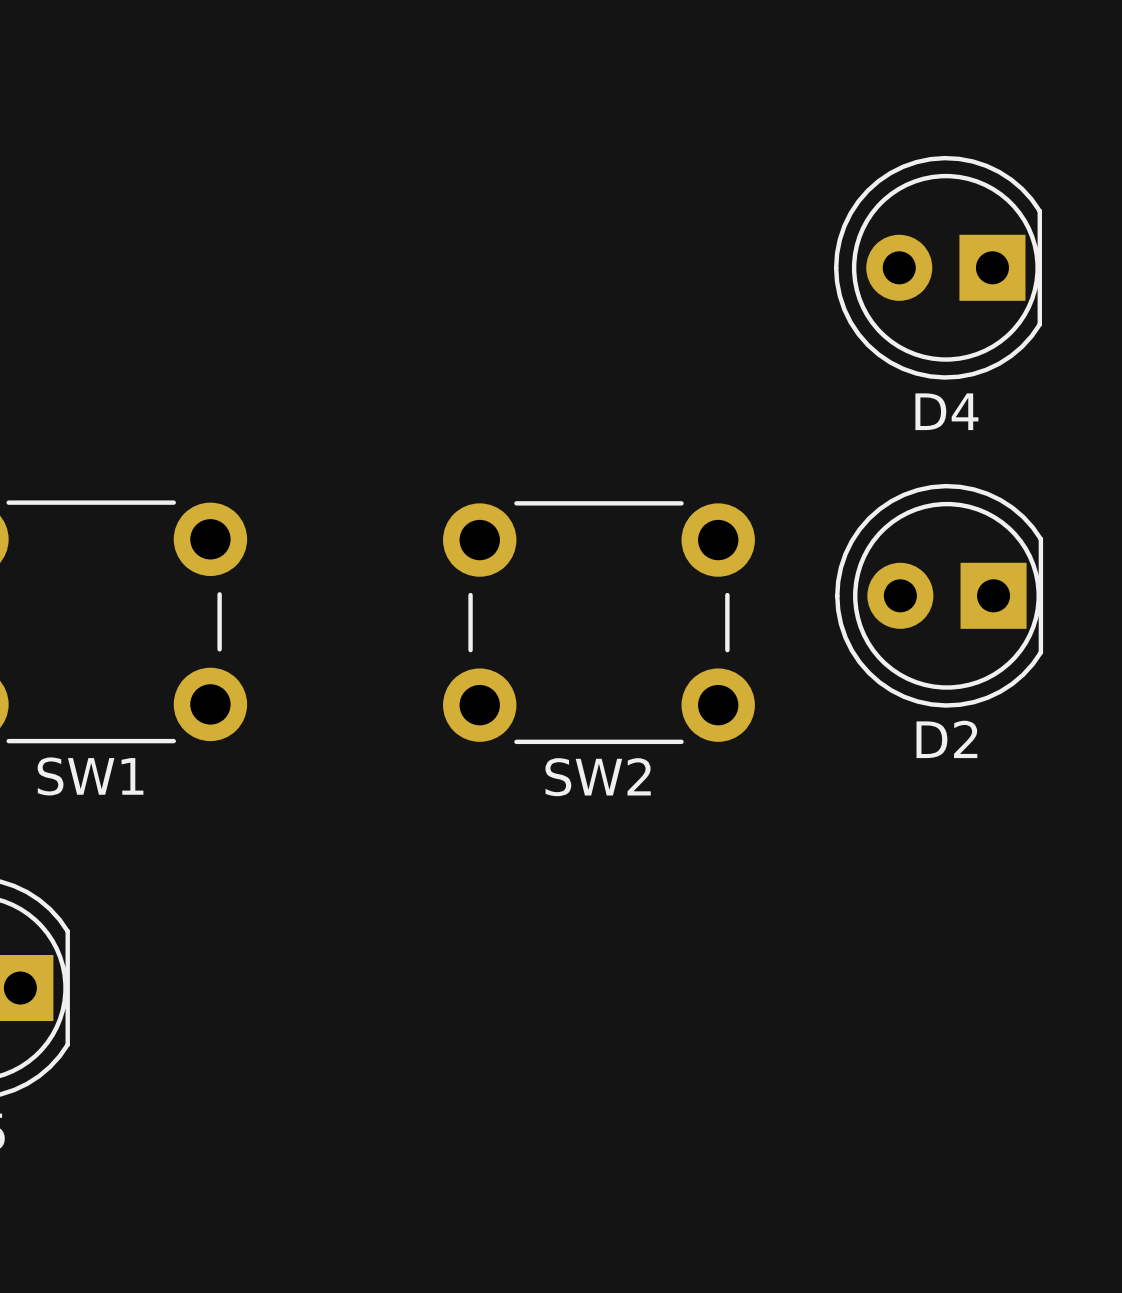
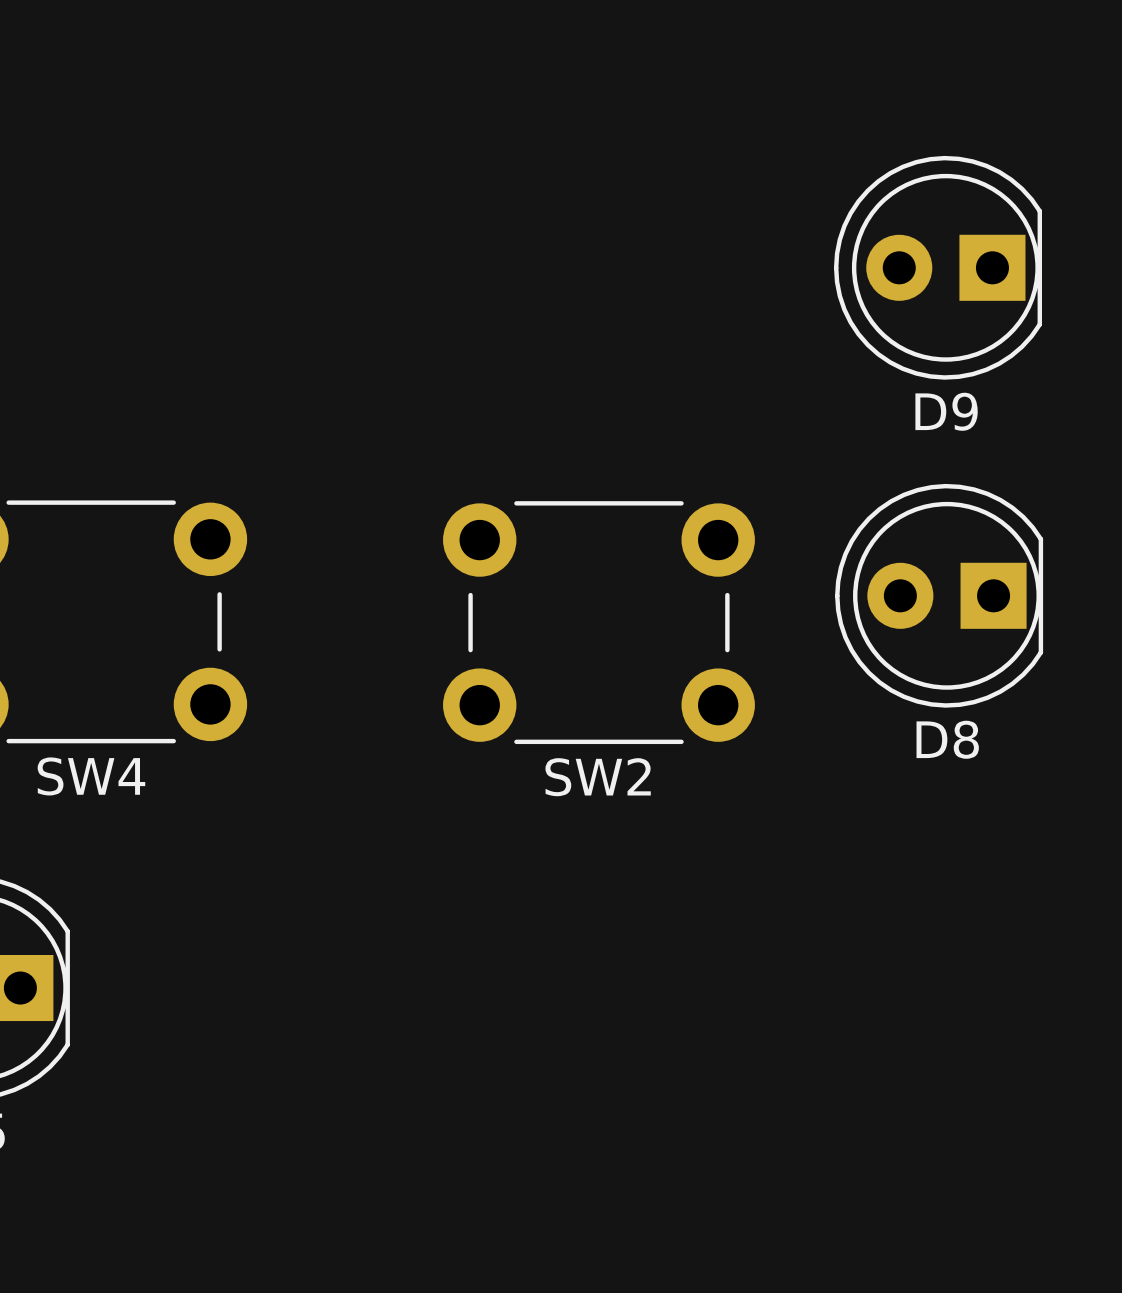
D4 name: D4 (946, 411) -> D9 (946, 411)
D2 name: D2 (946, 739) -> D8 (947, 739)
SW1 name: SW1 (90, 776) -> SW4 (91, 776)

